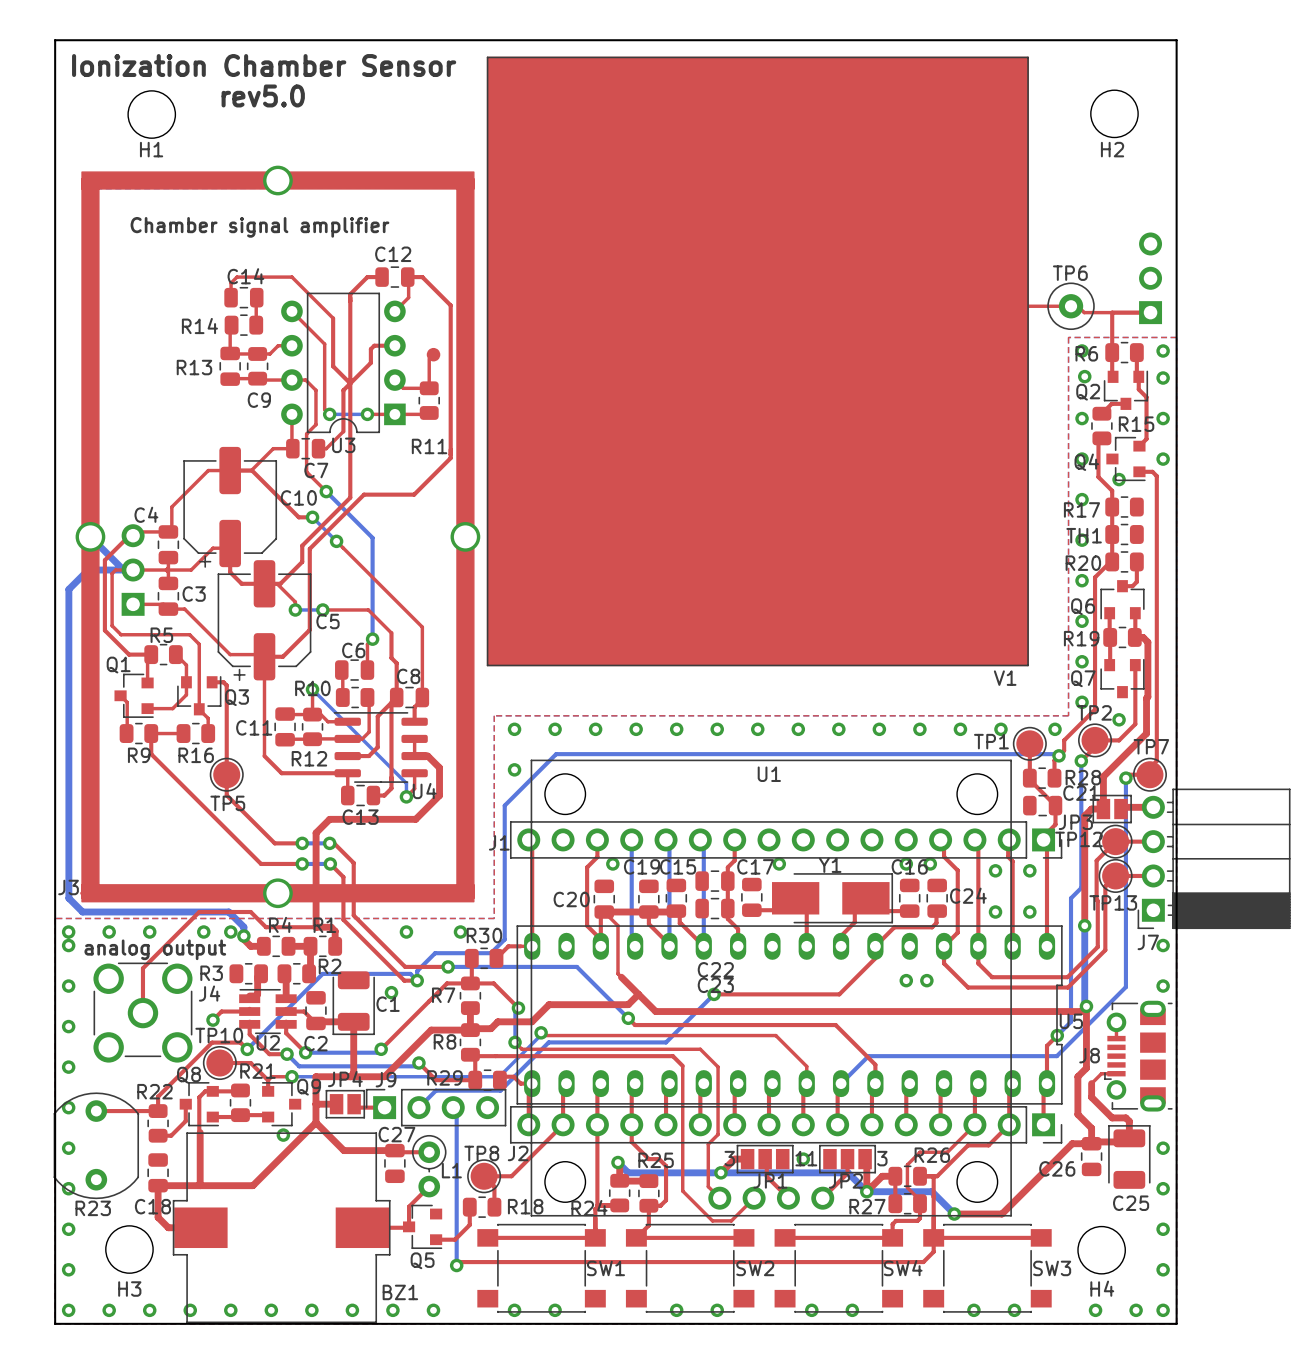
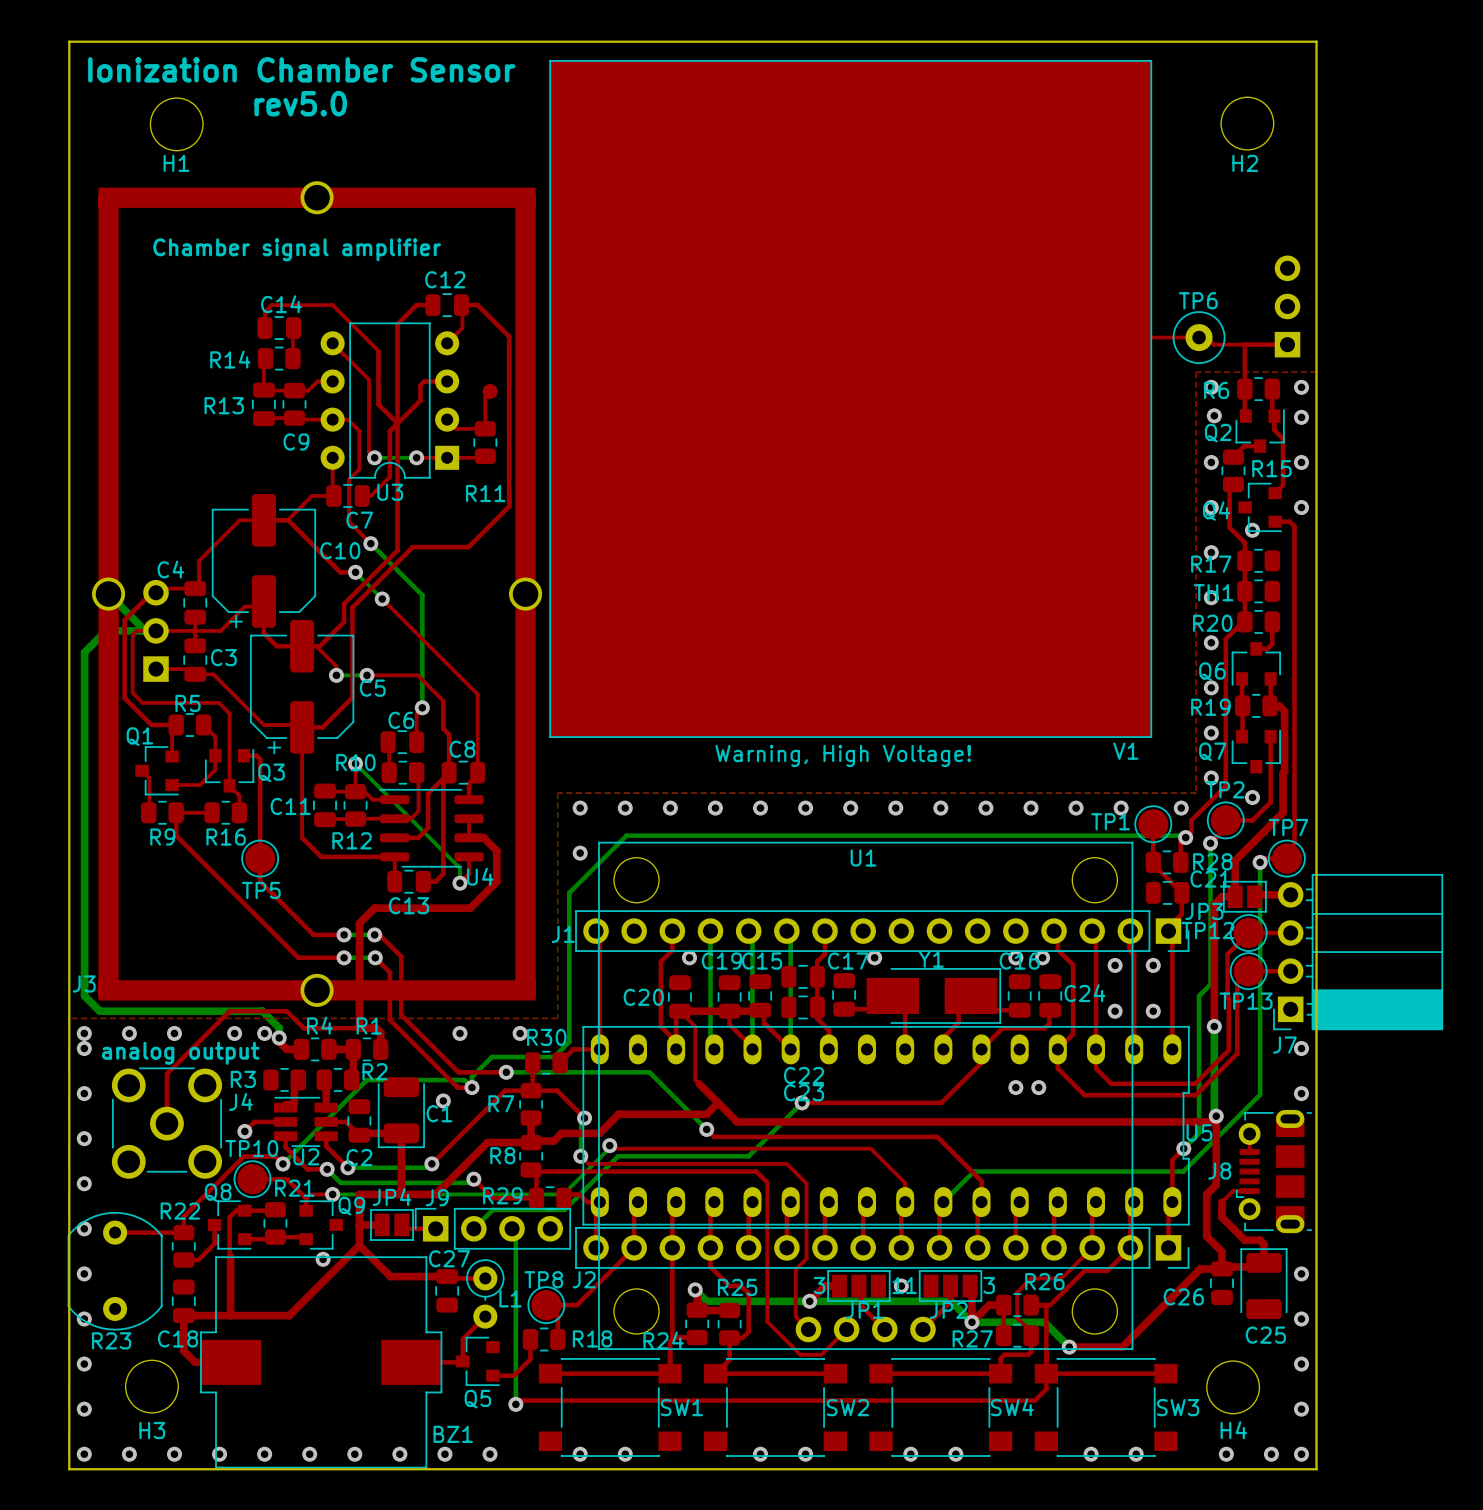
V1 text: none -> Warning, High Voltage! (843, 755)

